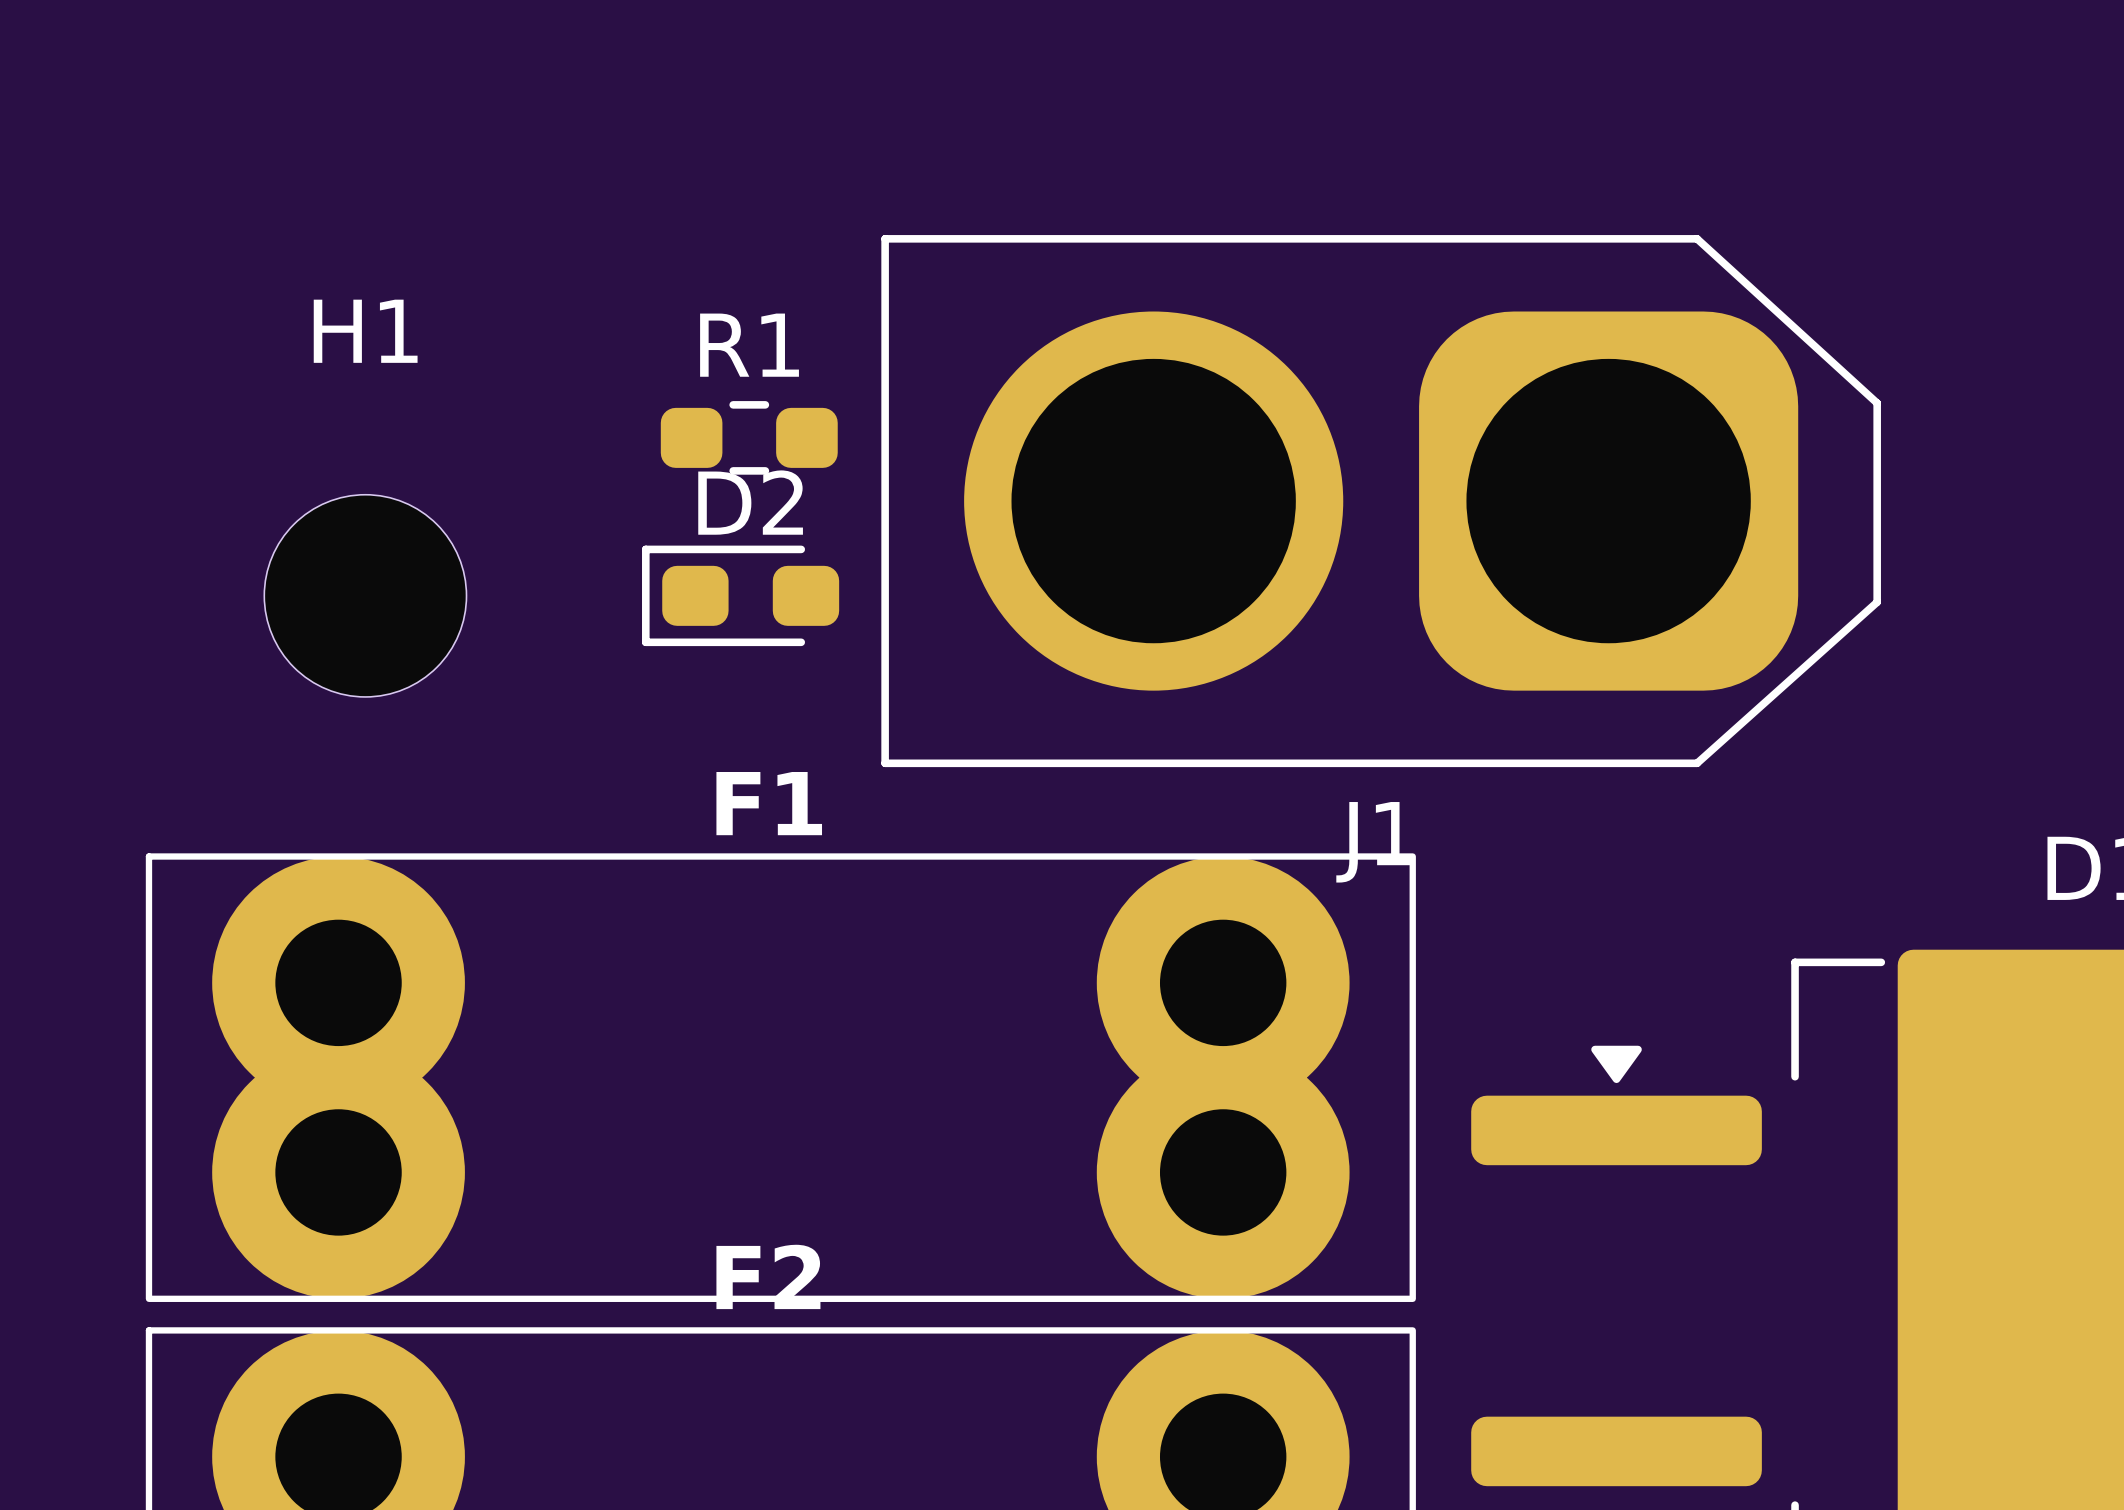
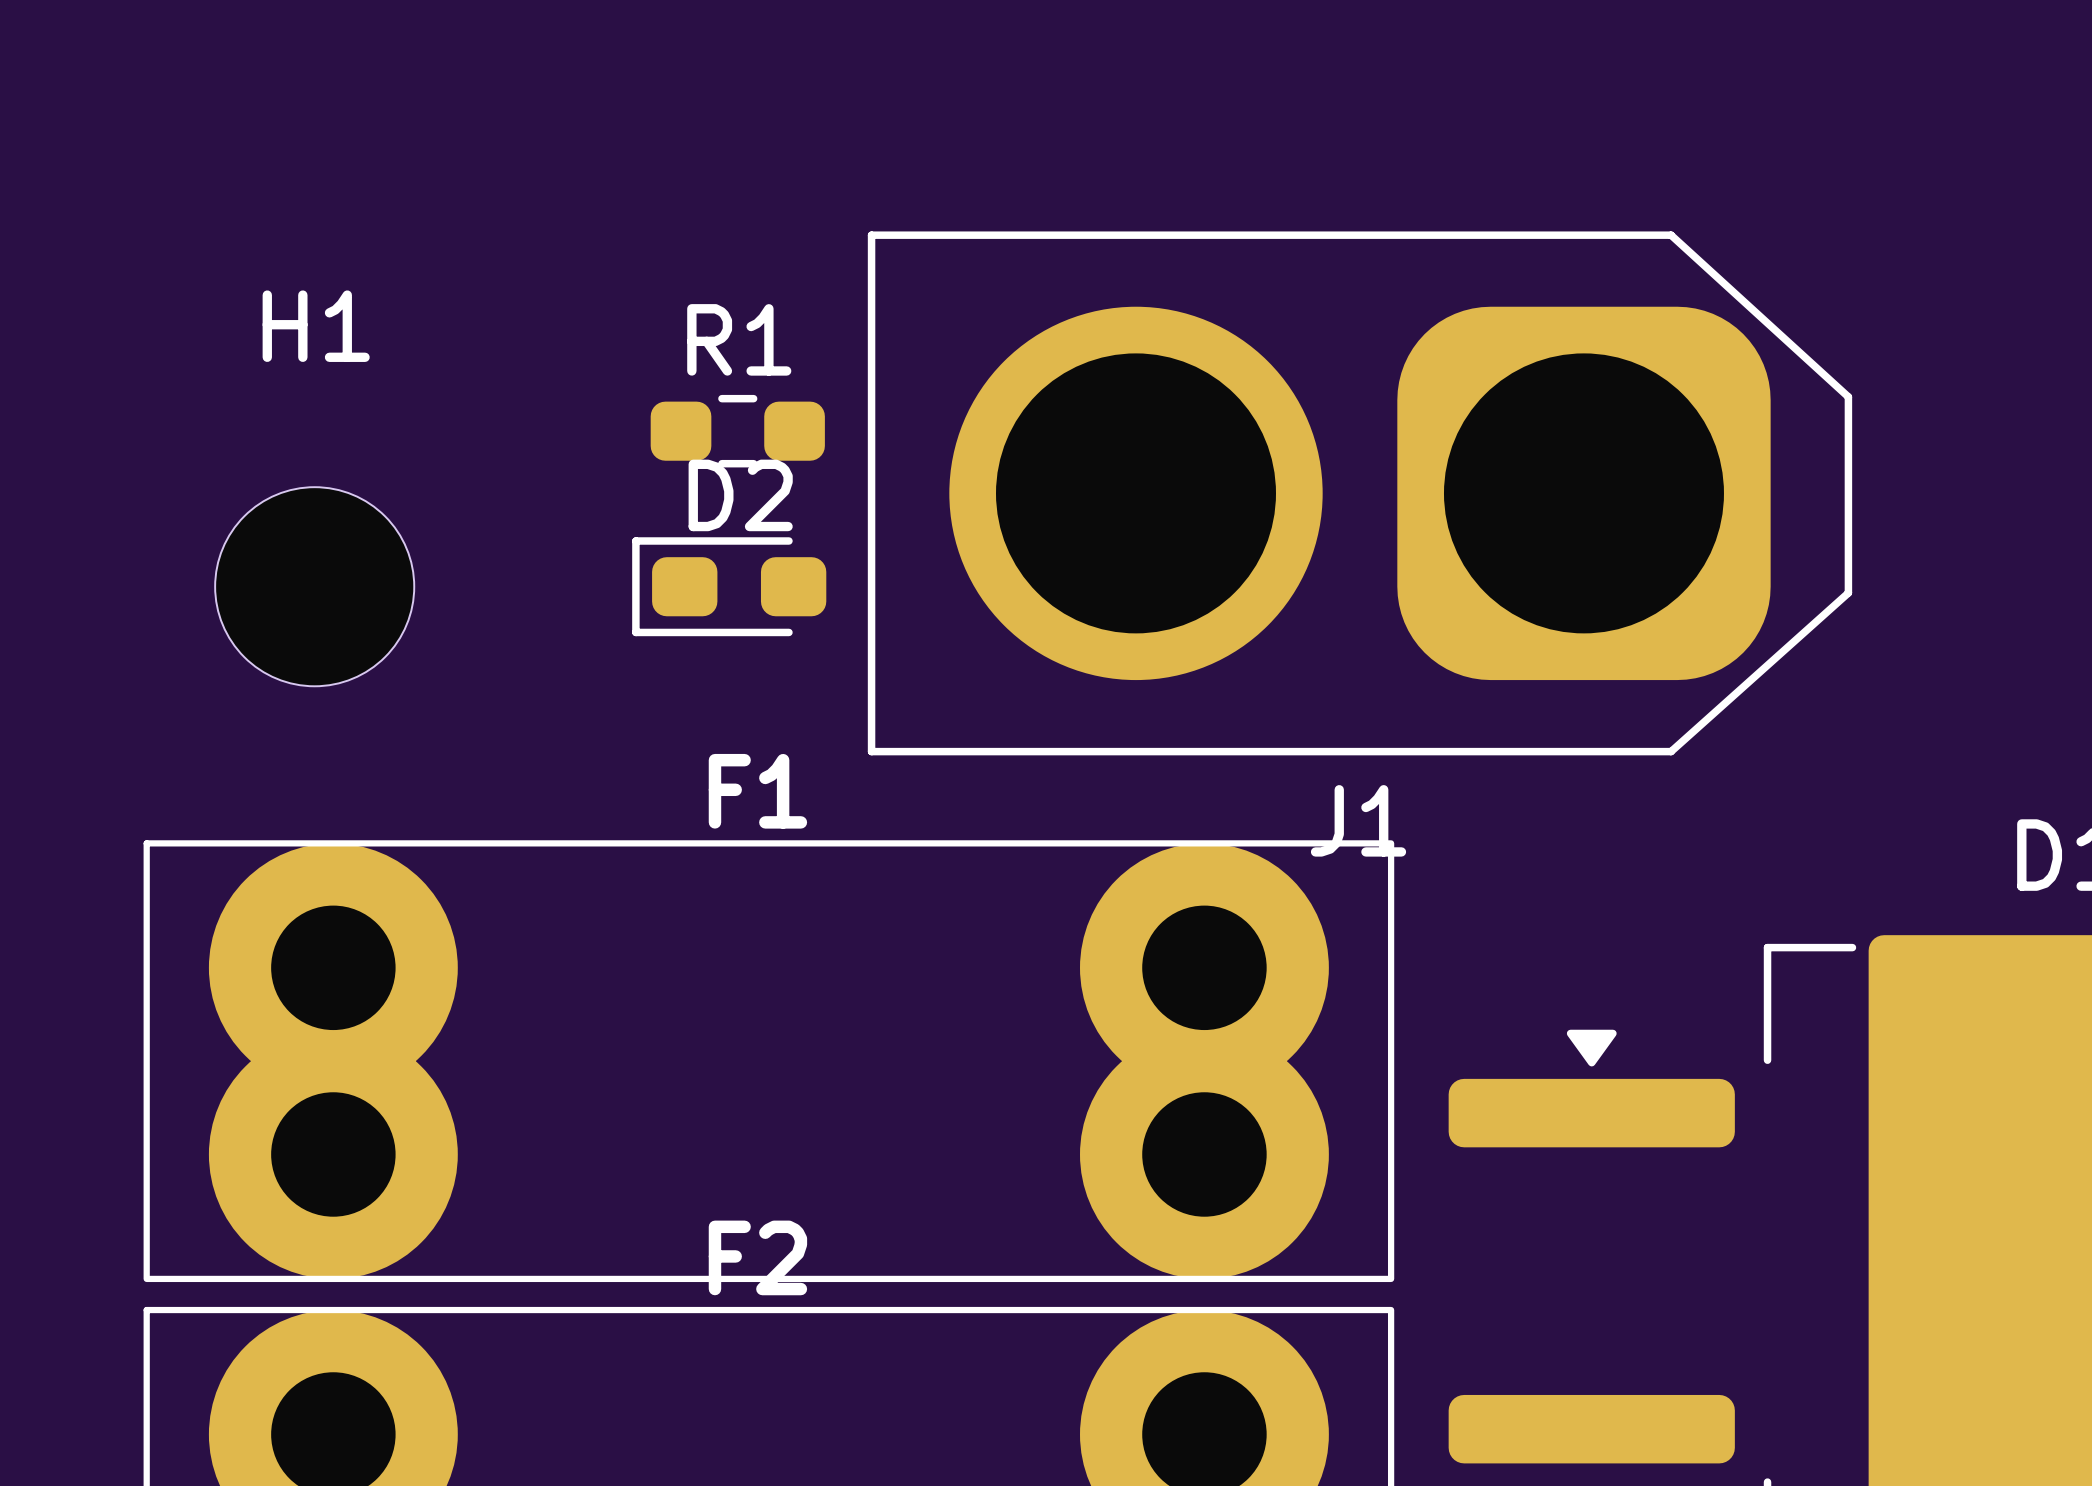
H1 position: (365, 595) -> (314, 586)

